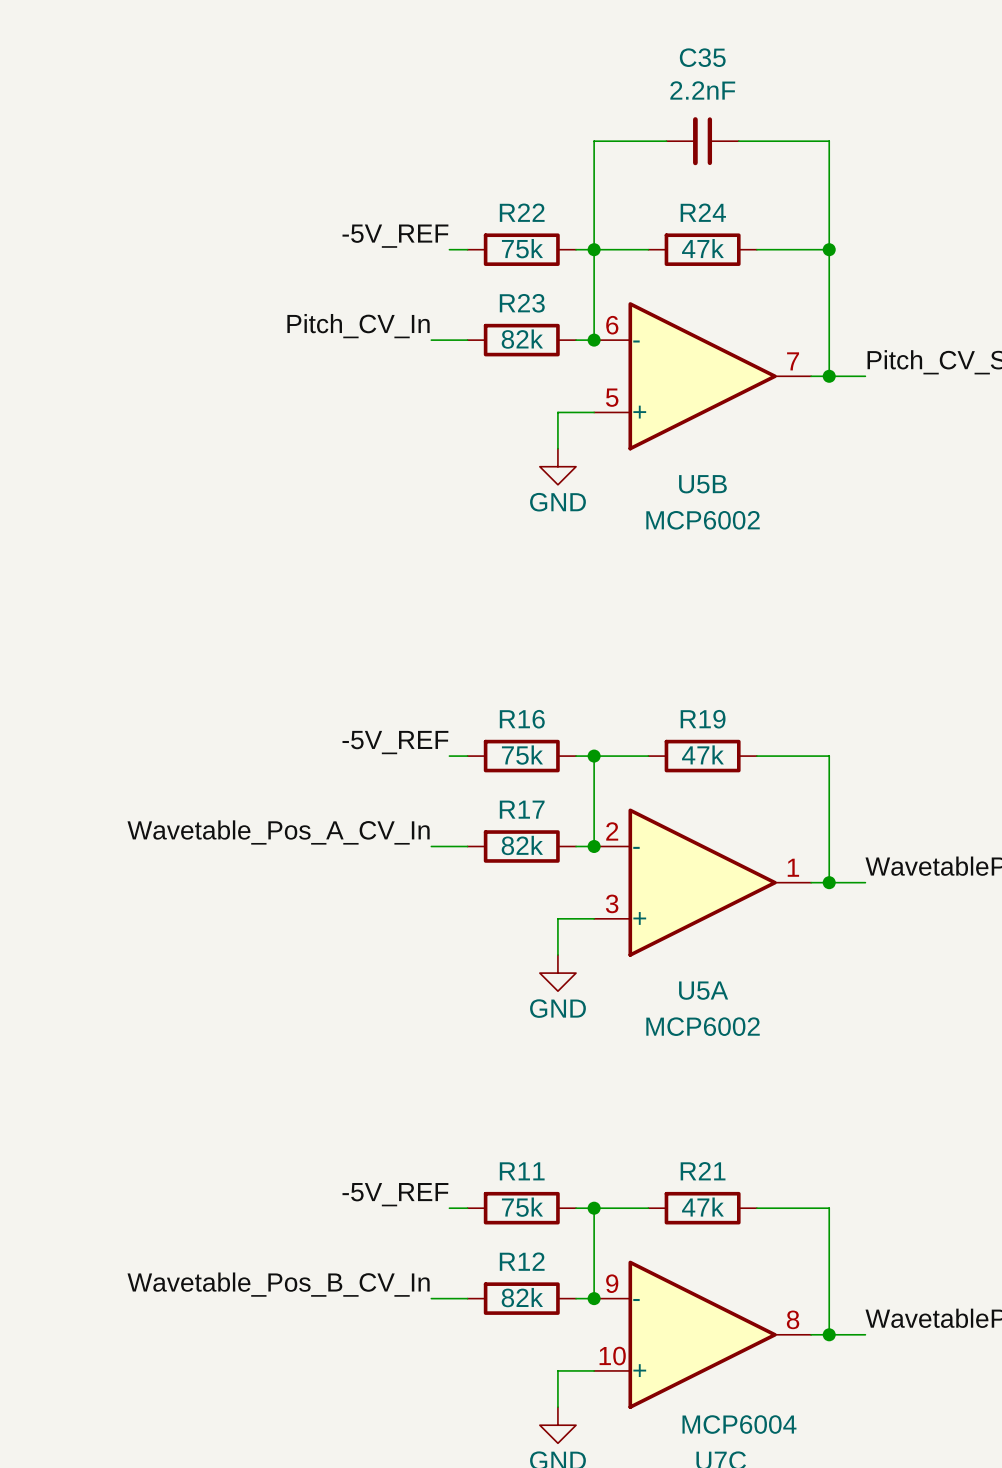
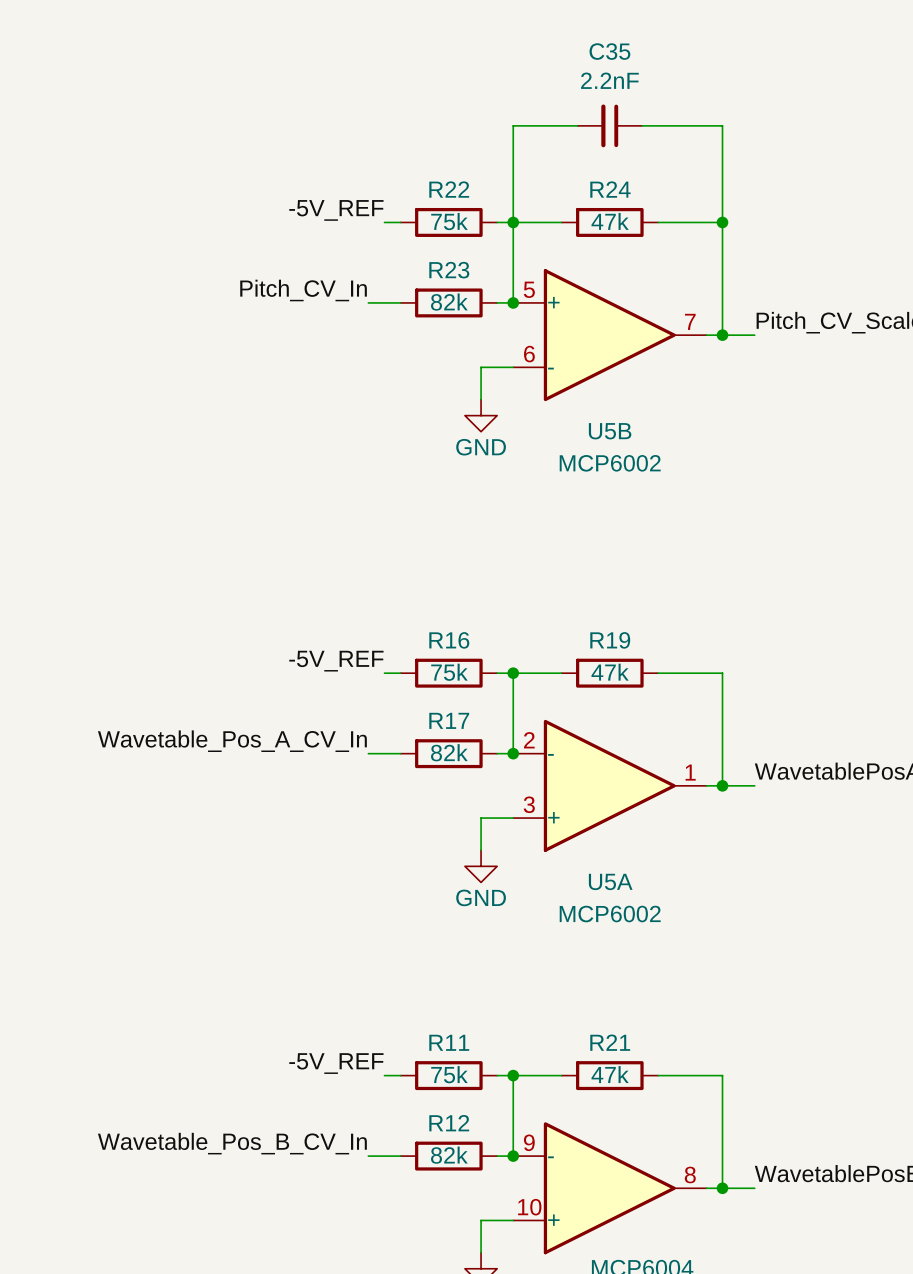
U5B flip: as is (702, 376) -> up-down (609, 335)

